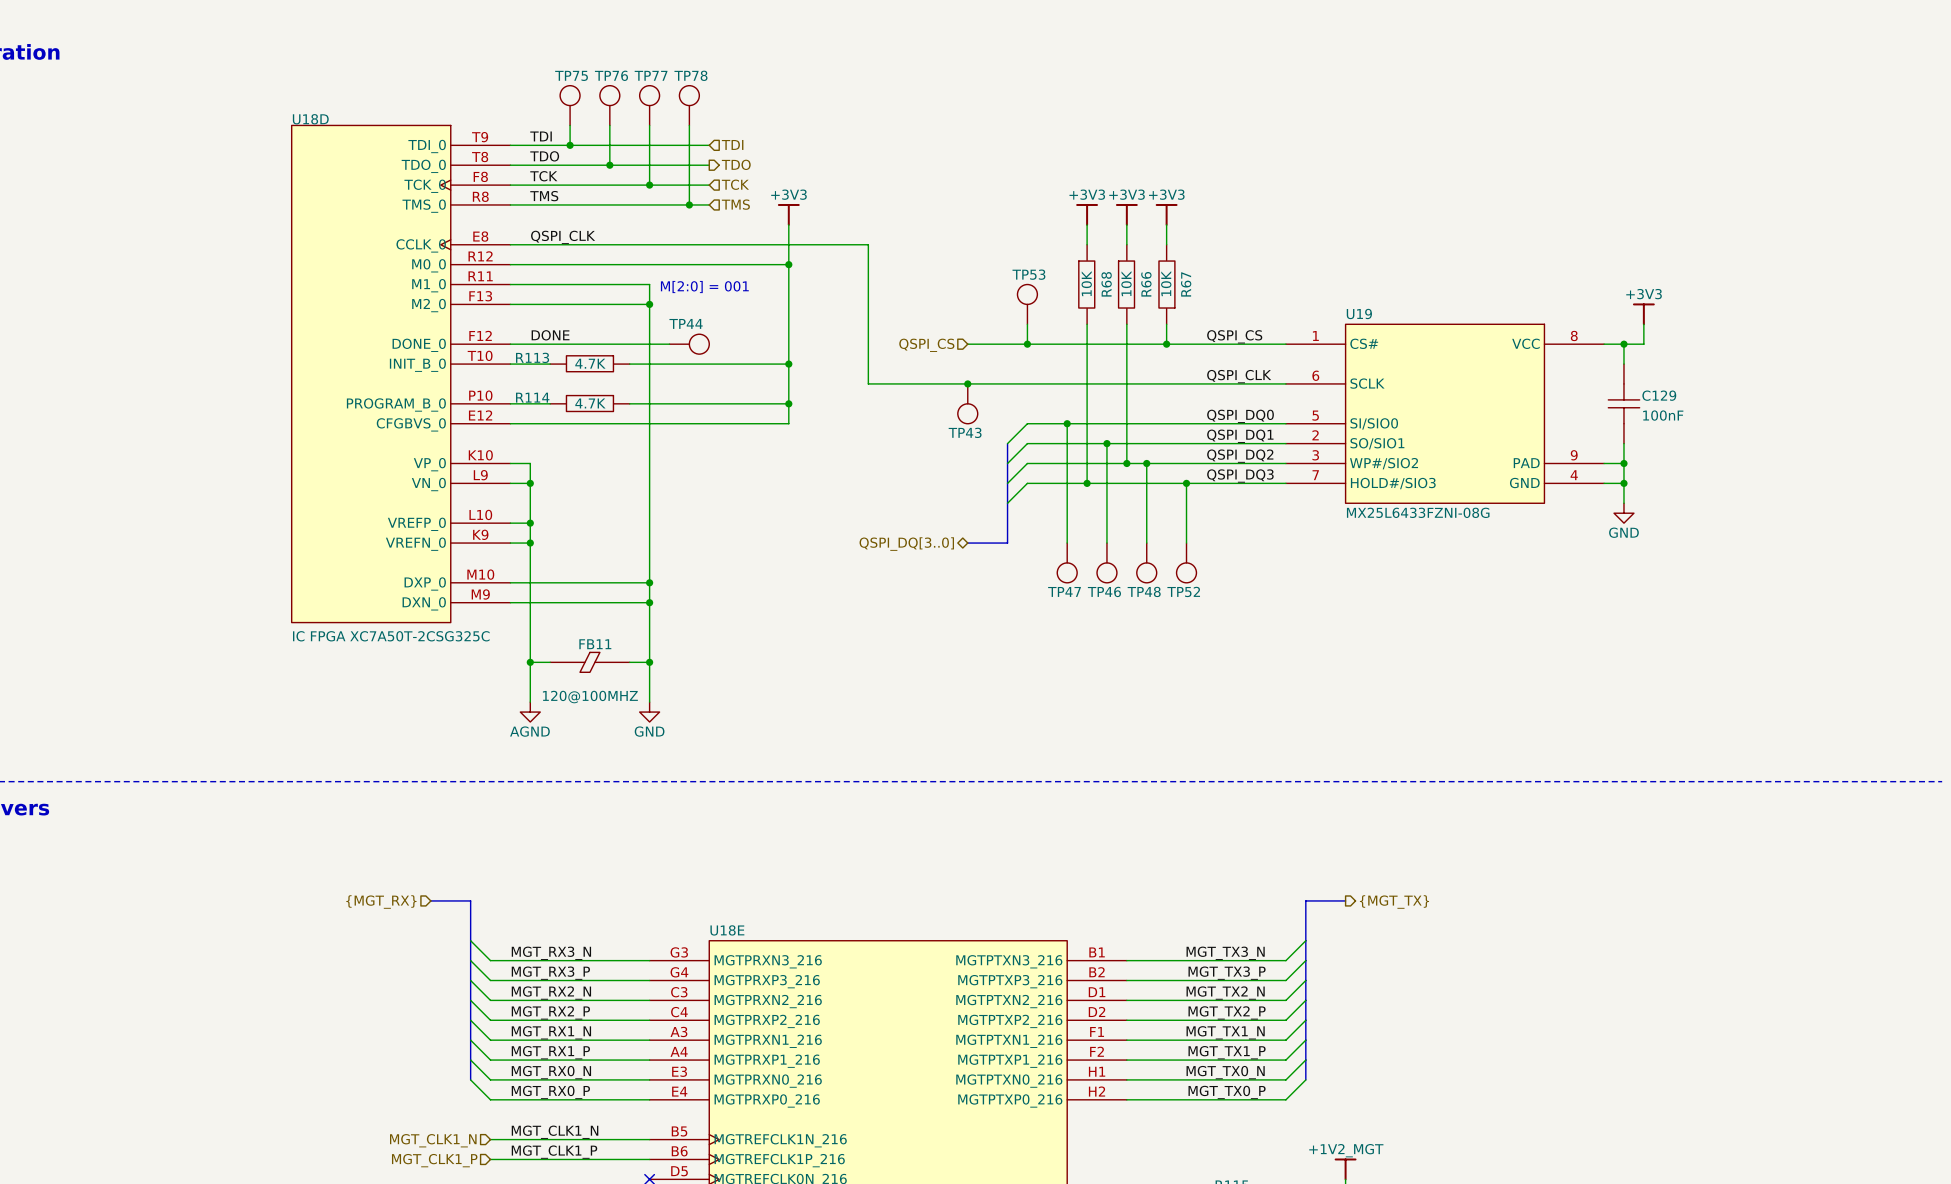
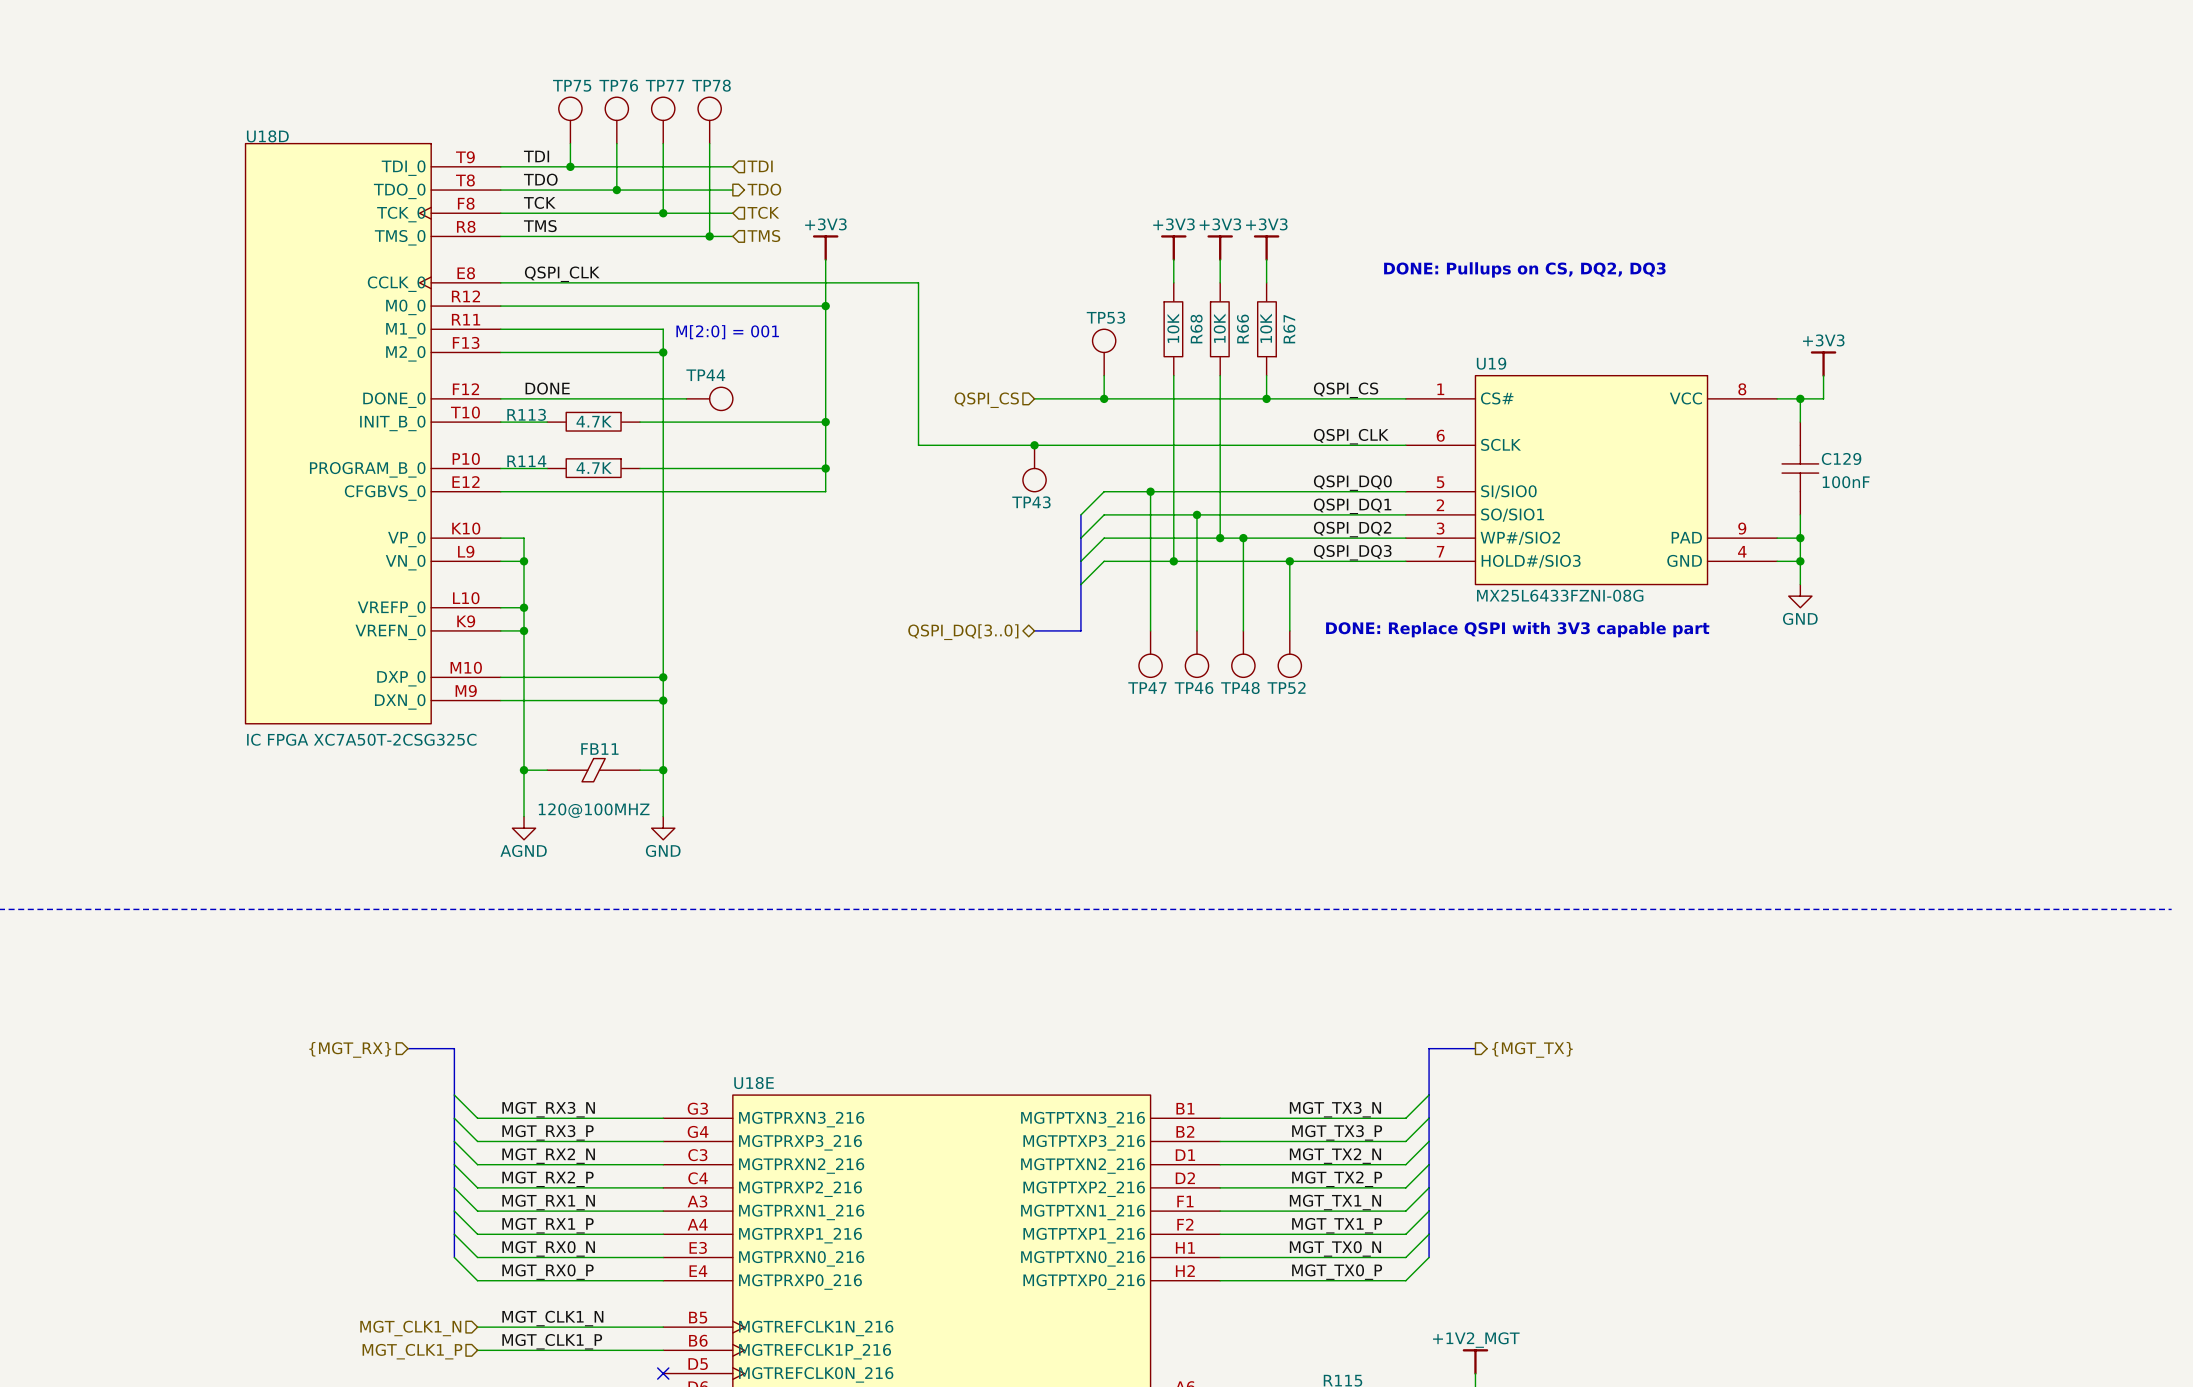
text: none -> DONE: Pullups on CS, DQ2, DQ3 (1524, 269)
text: none -> DONE: Replace QSPI with 3V3 capable part (1517, 629)

